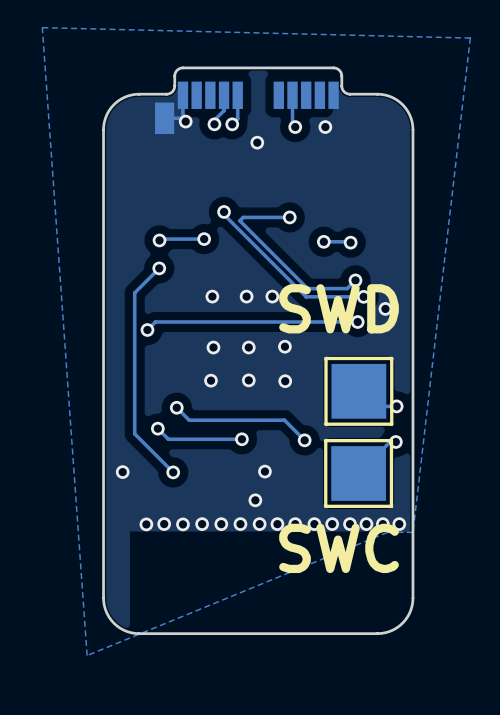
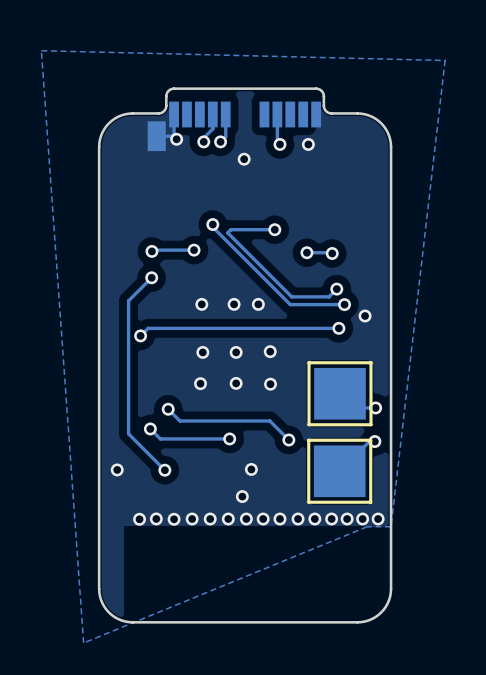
text: SWD (339, 308) -> none
text: SWC (339, 548) -> none

